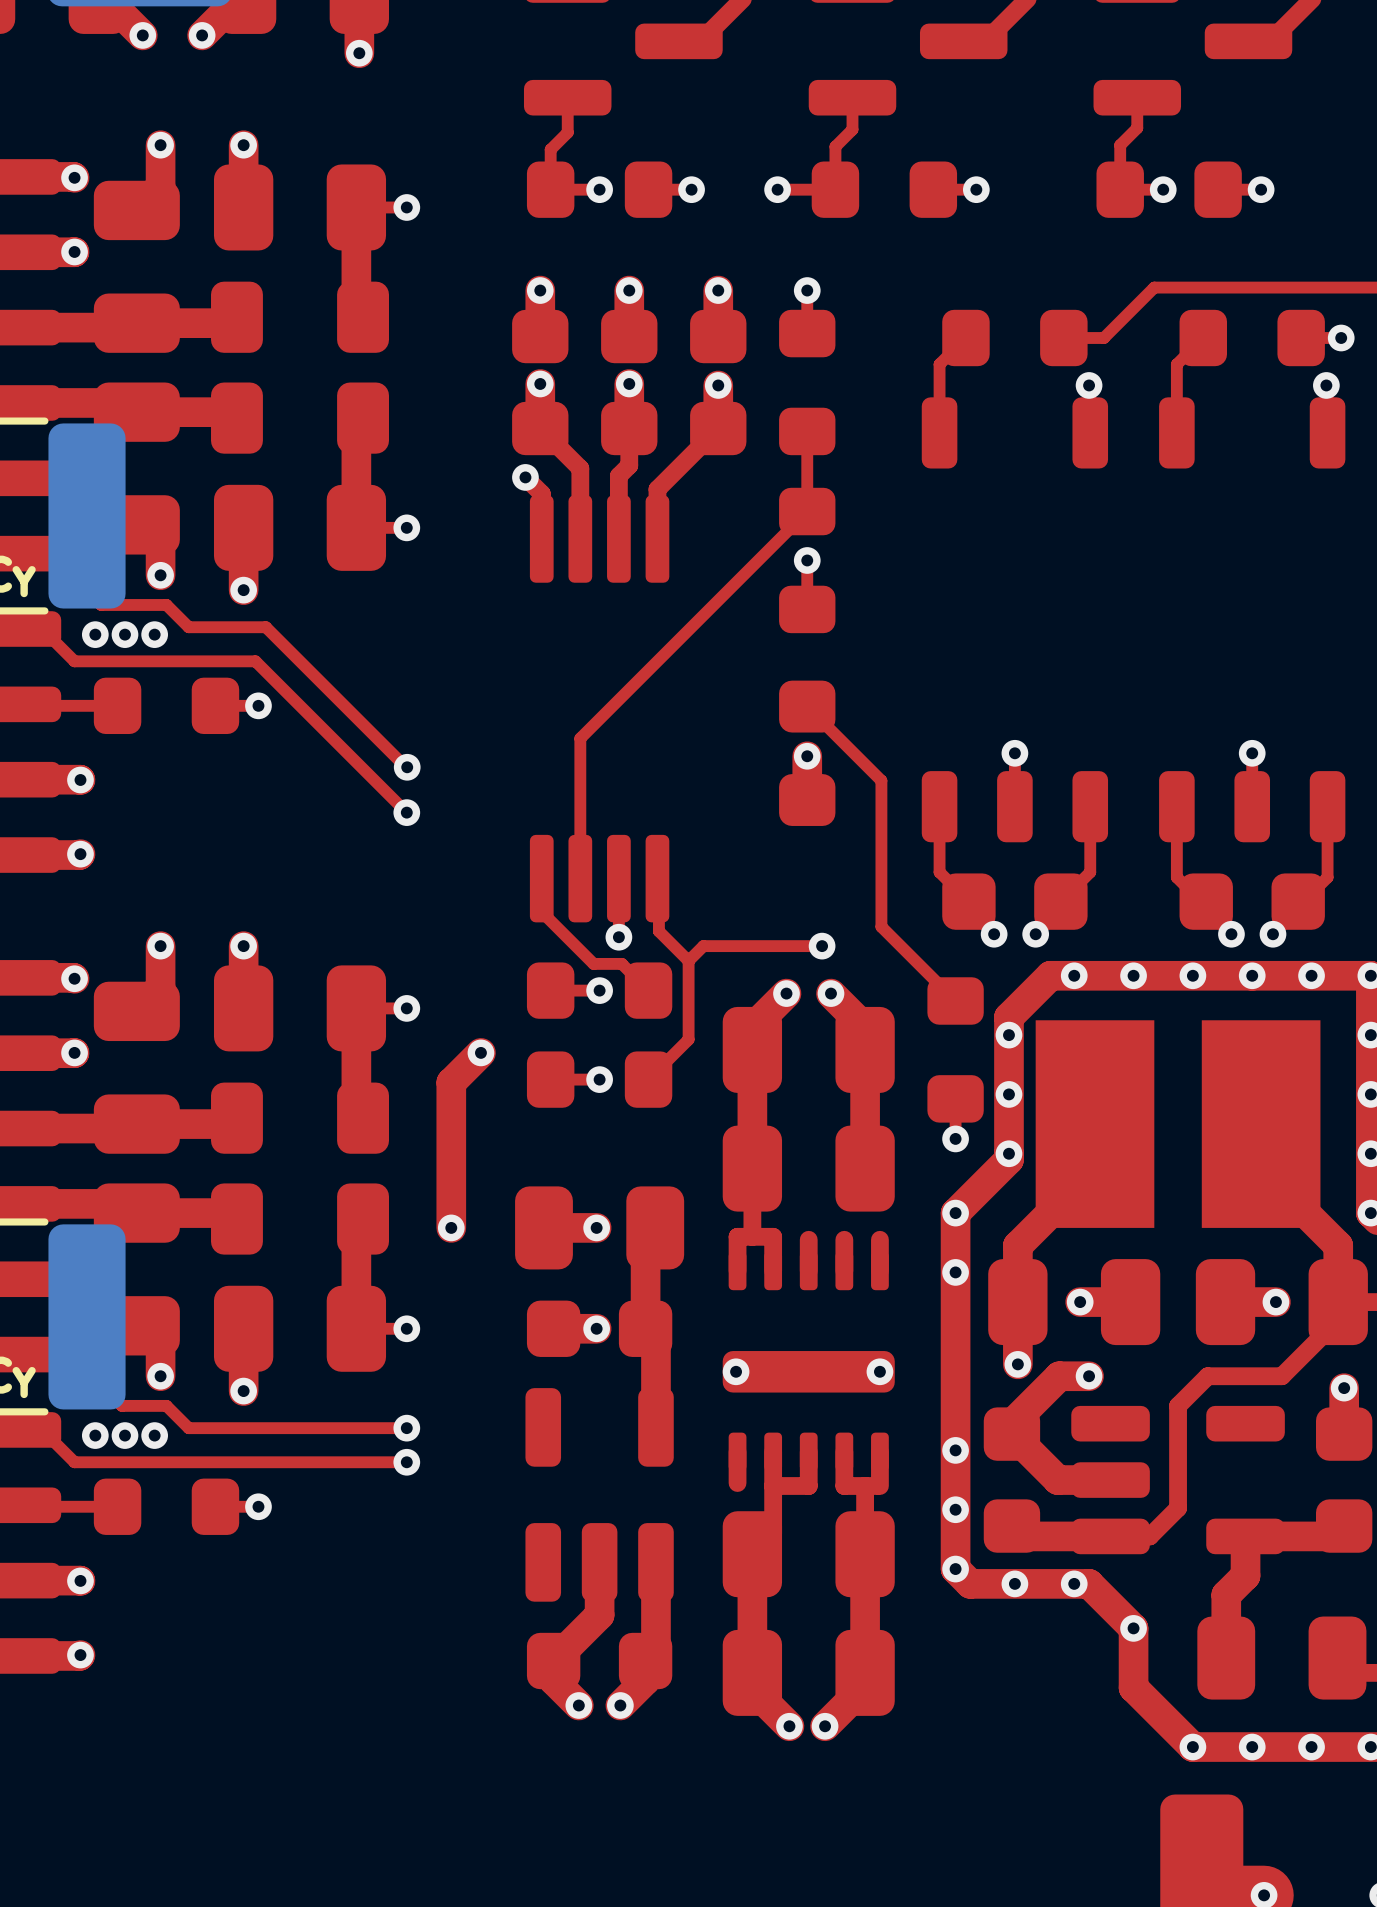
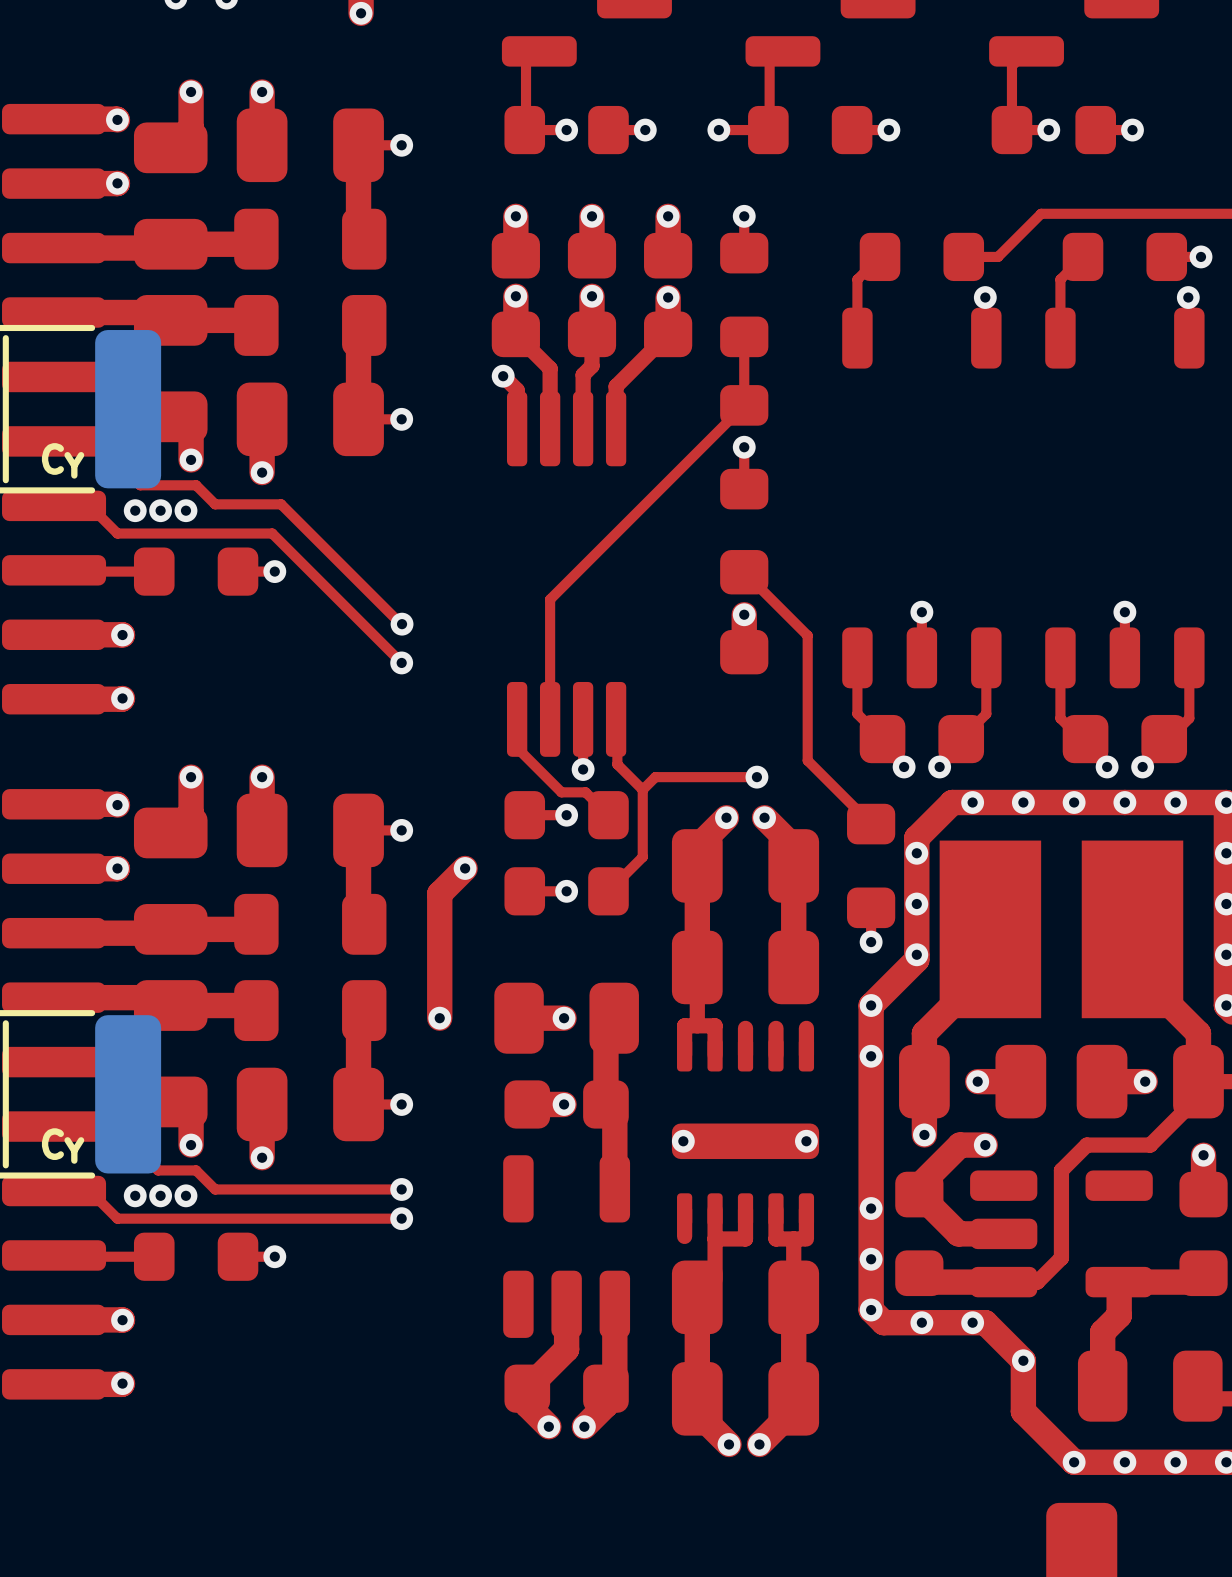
top track: (567, 97) (567, 132) (550, 149) (550, 189) -> (539, 51) (531, 51) (526, 56) (524, 130)
top track: (852, 97) (852, 129) (835, 146) (835, 189) -> (782, 51) (772, 51) (769, 53) (768, 130)
top track: (1137, 97) (1137, 128) (1120, 145) -> (1026, 51) (1011, 65) (1011, 91)

